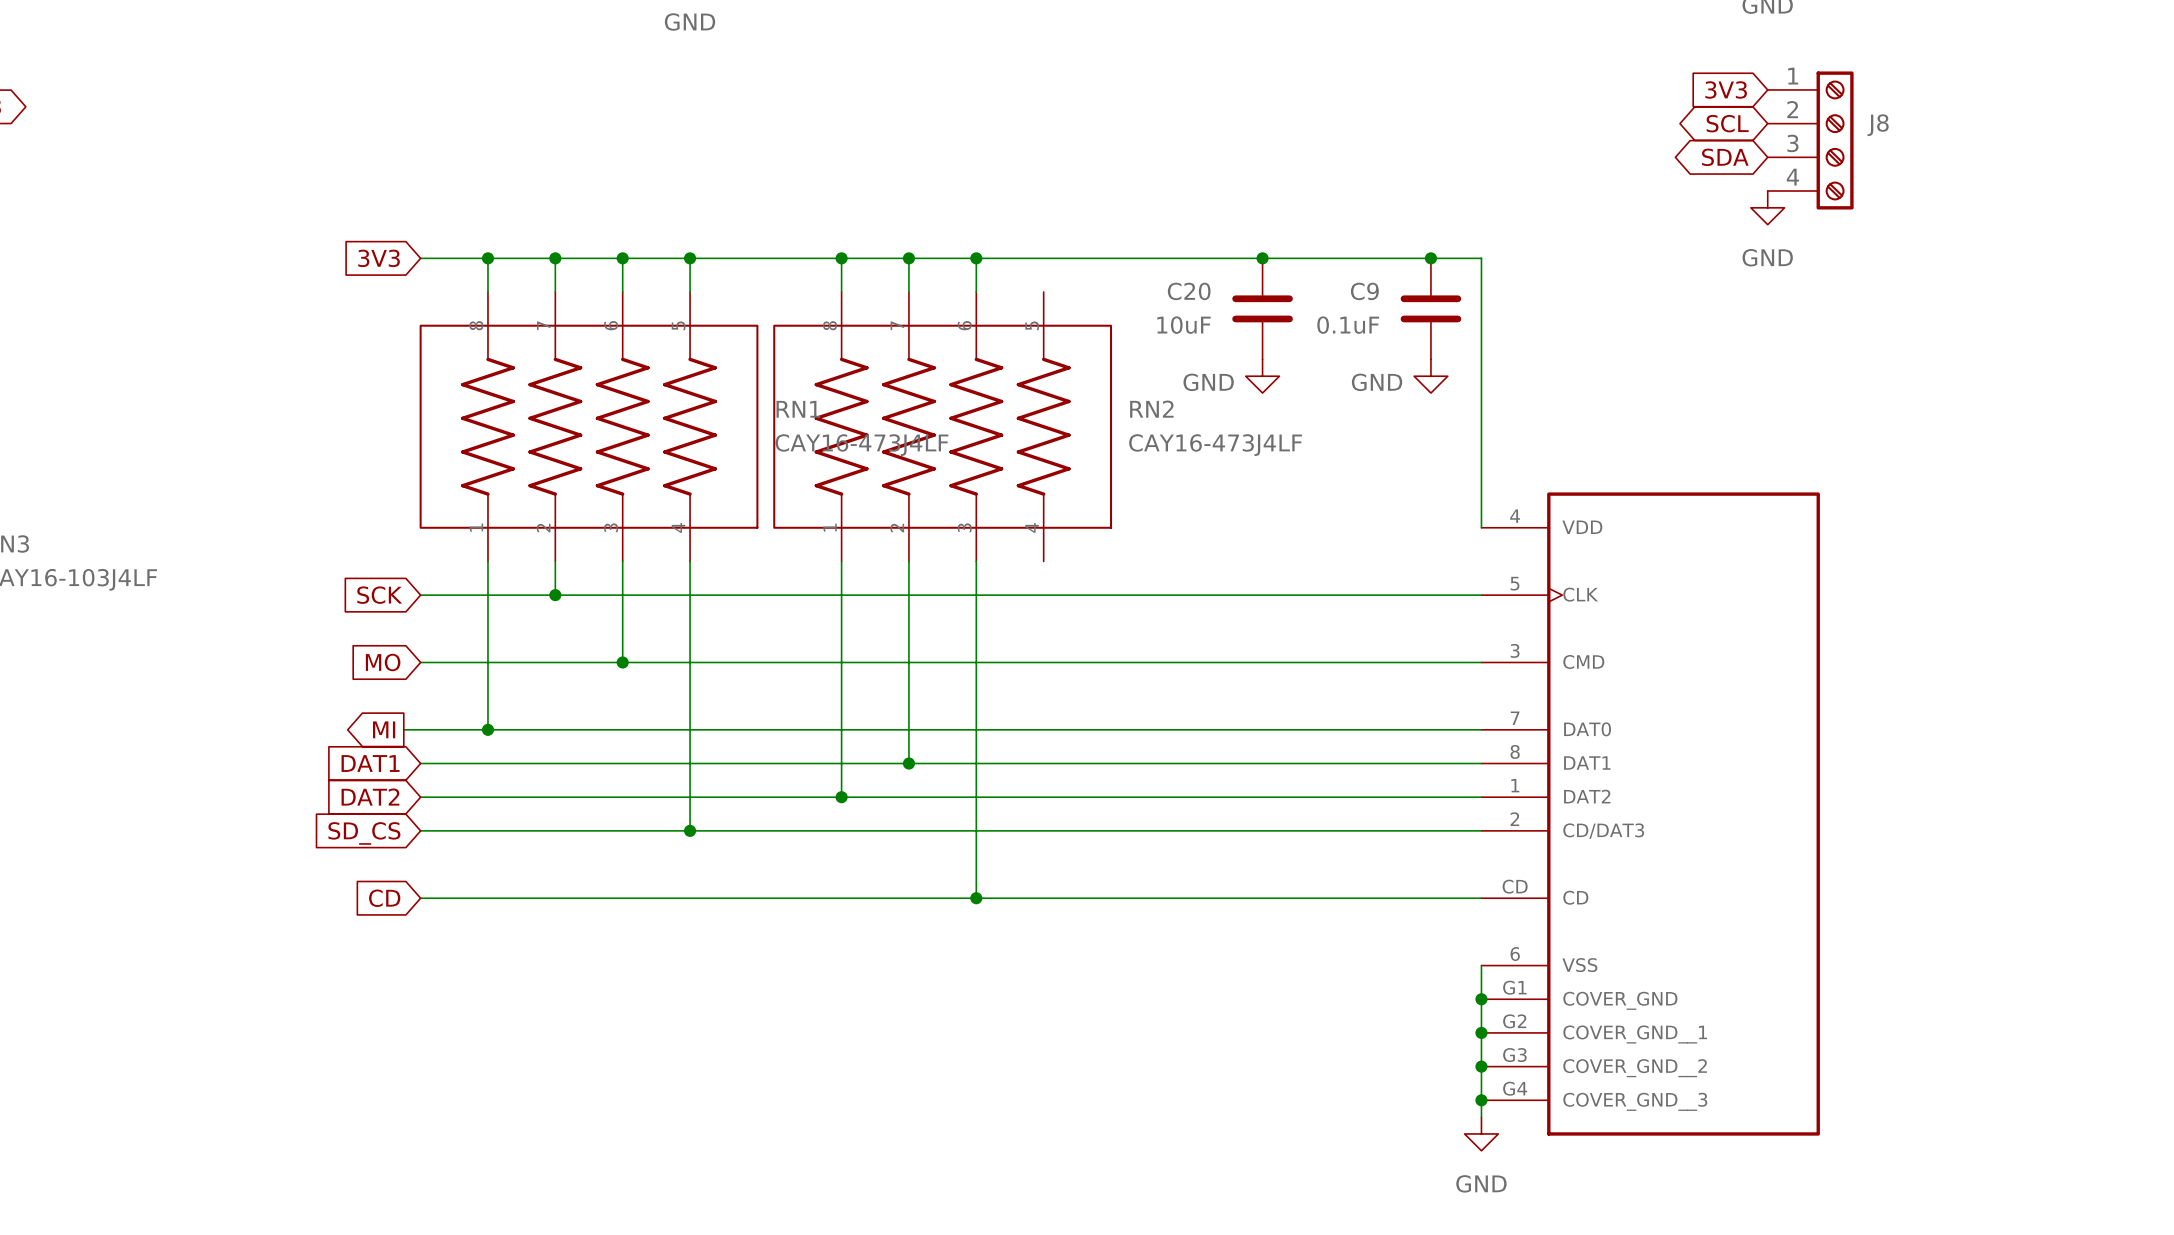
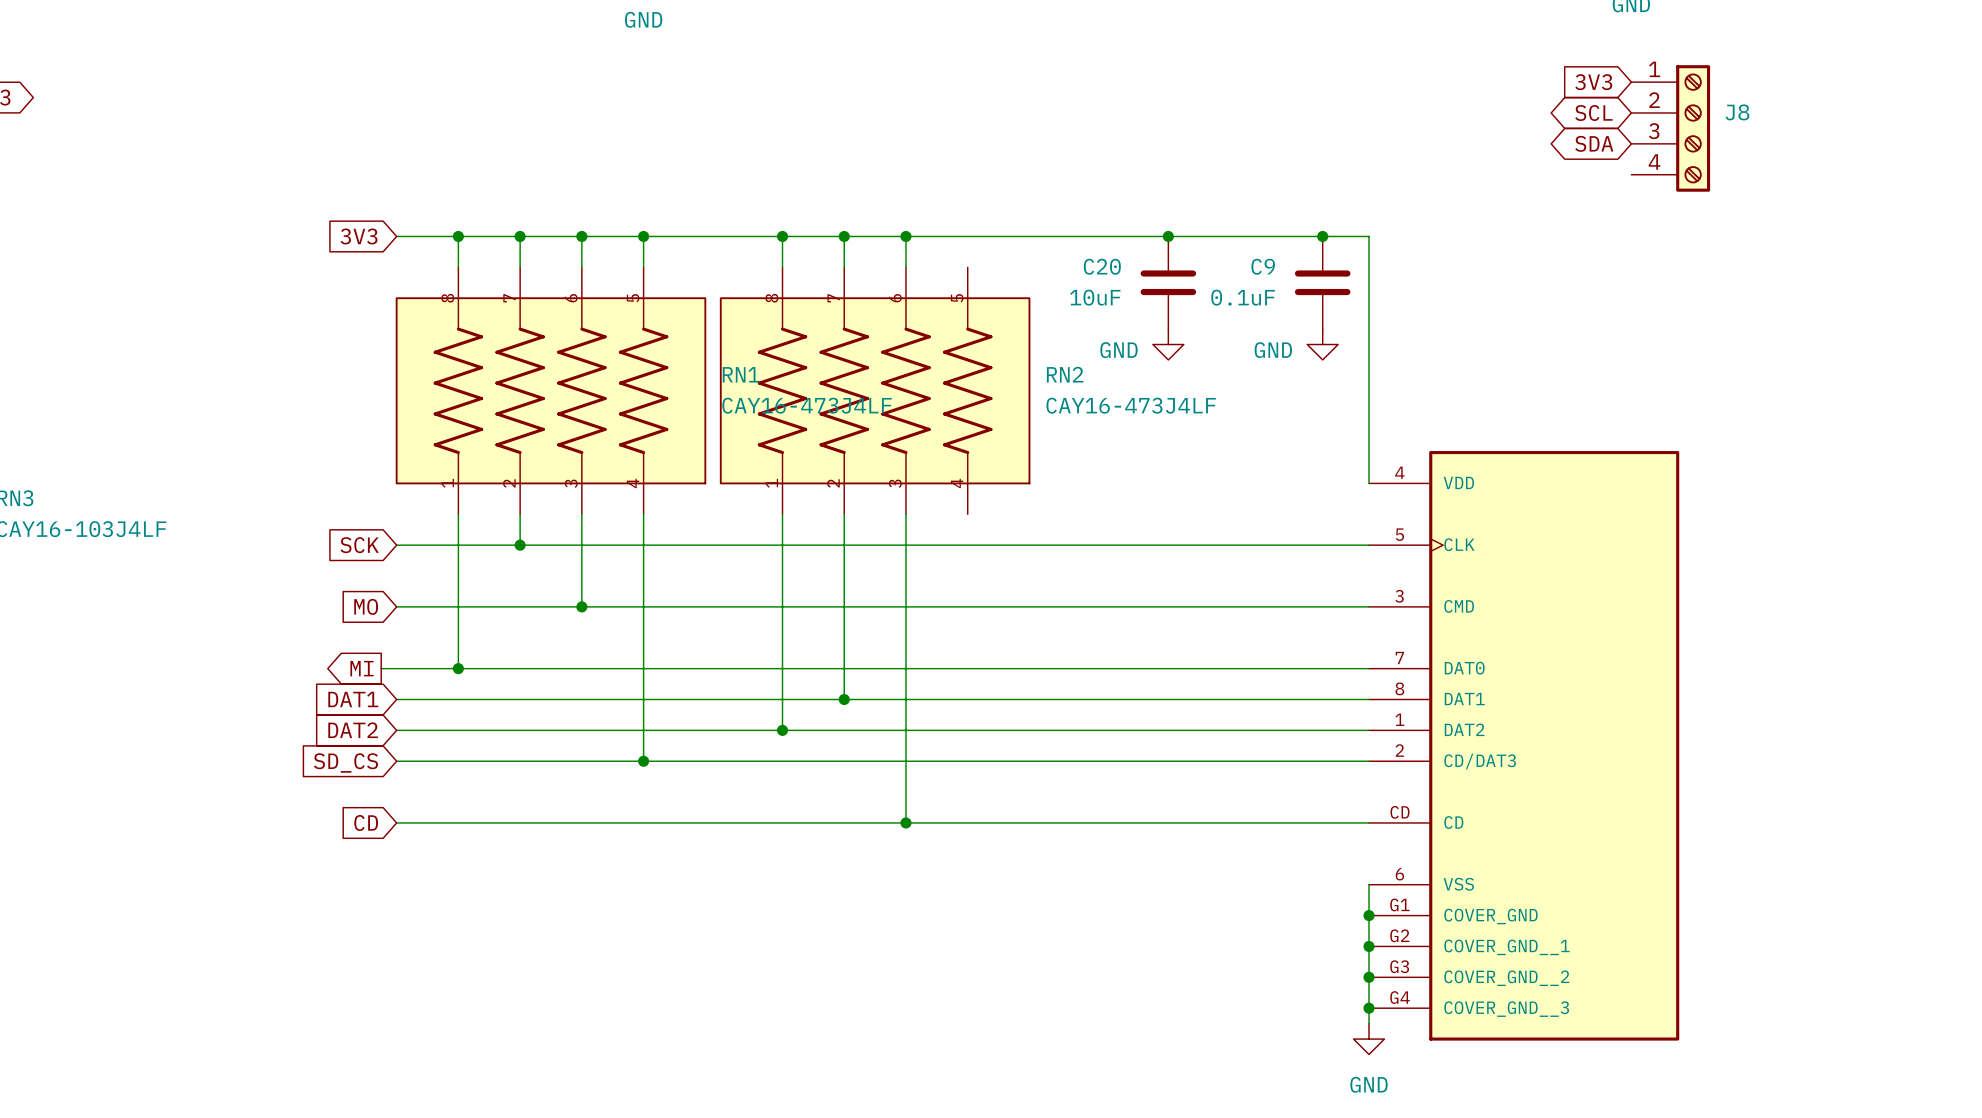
power symbol: GND (1767, 207) -> none

